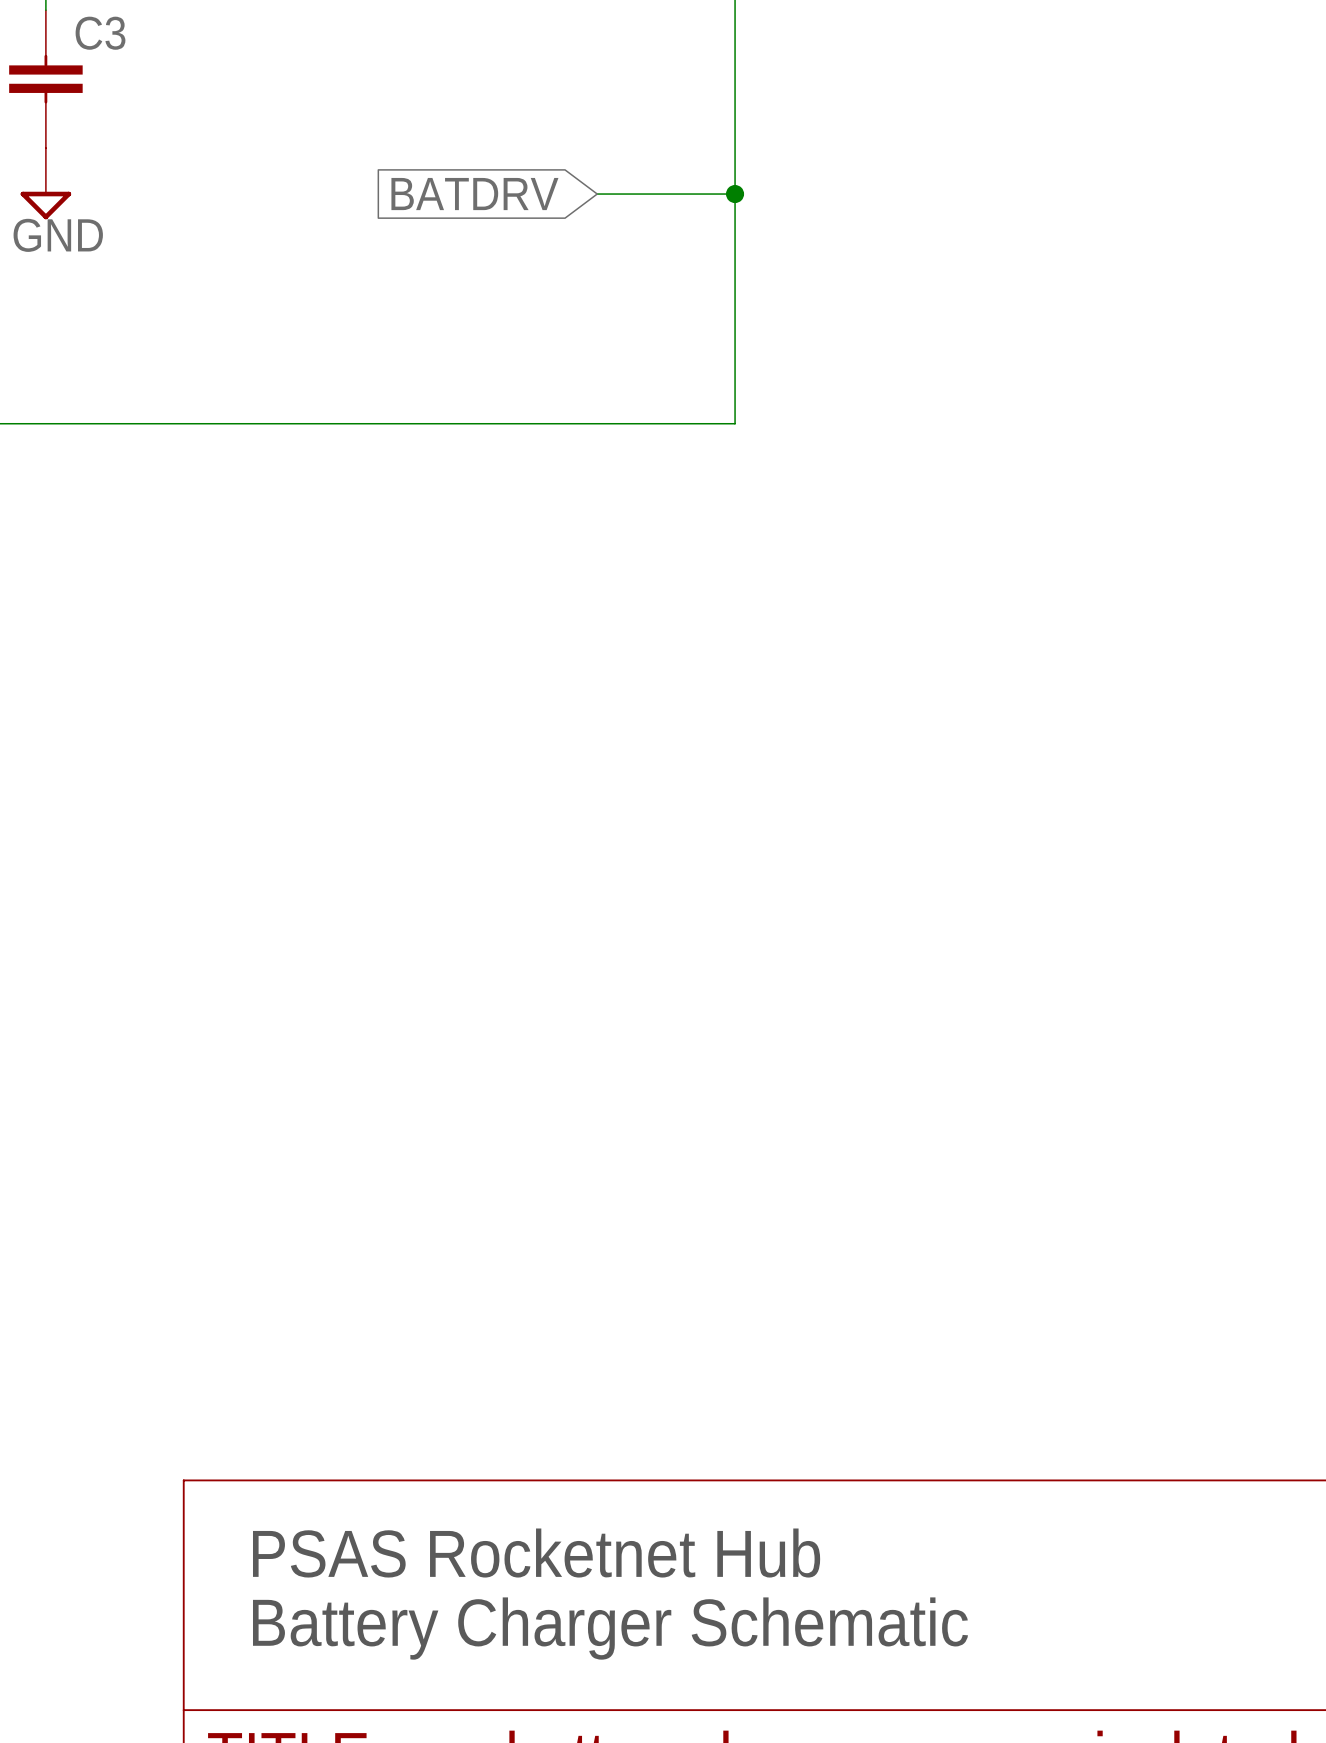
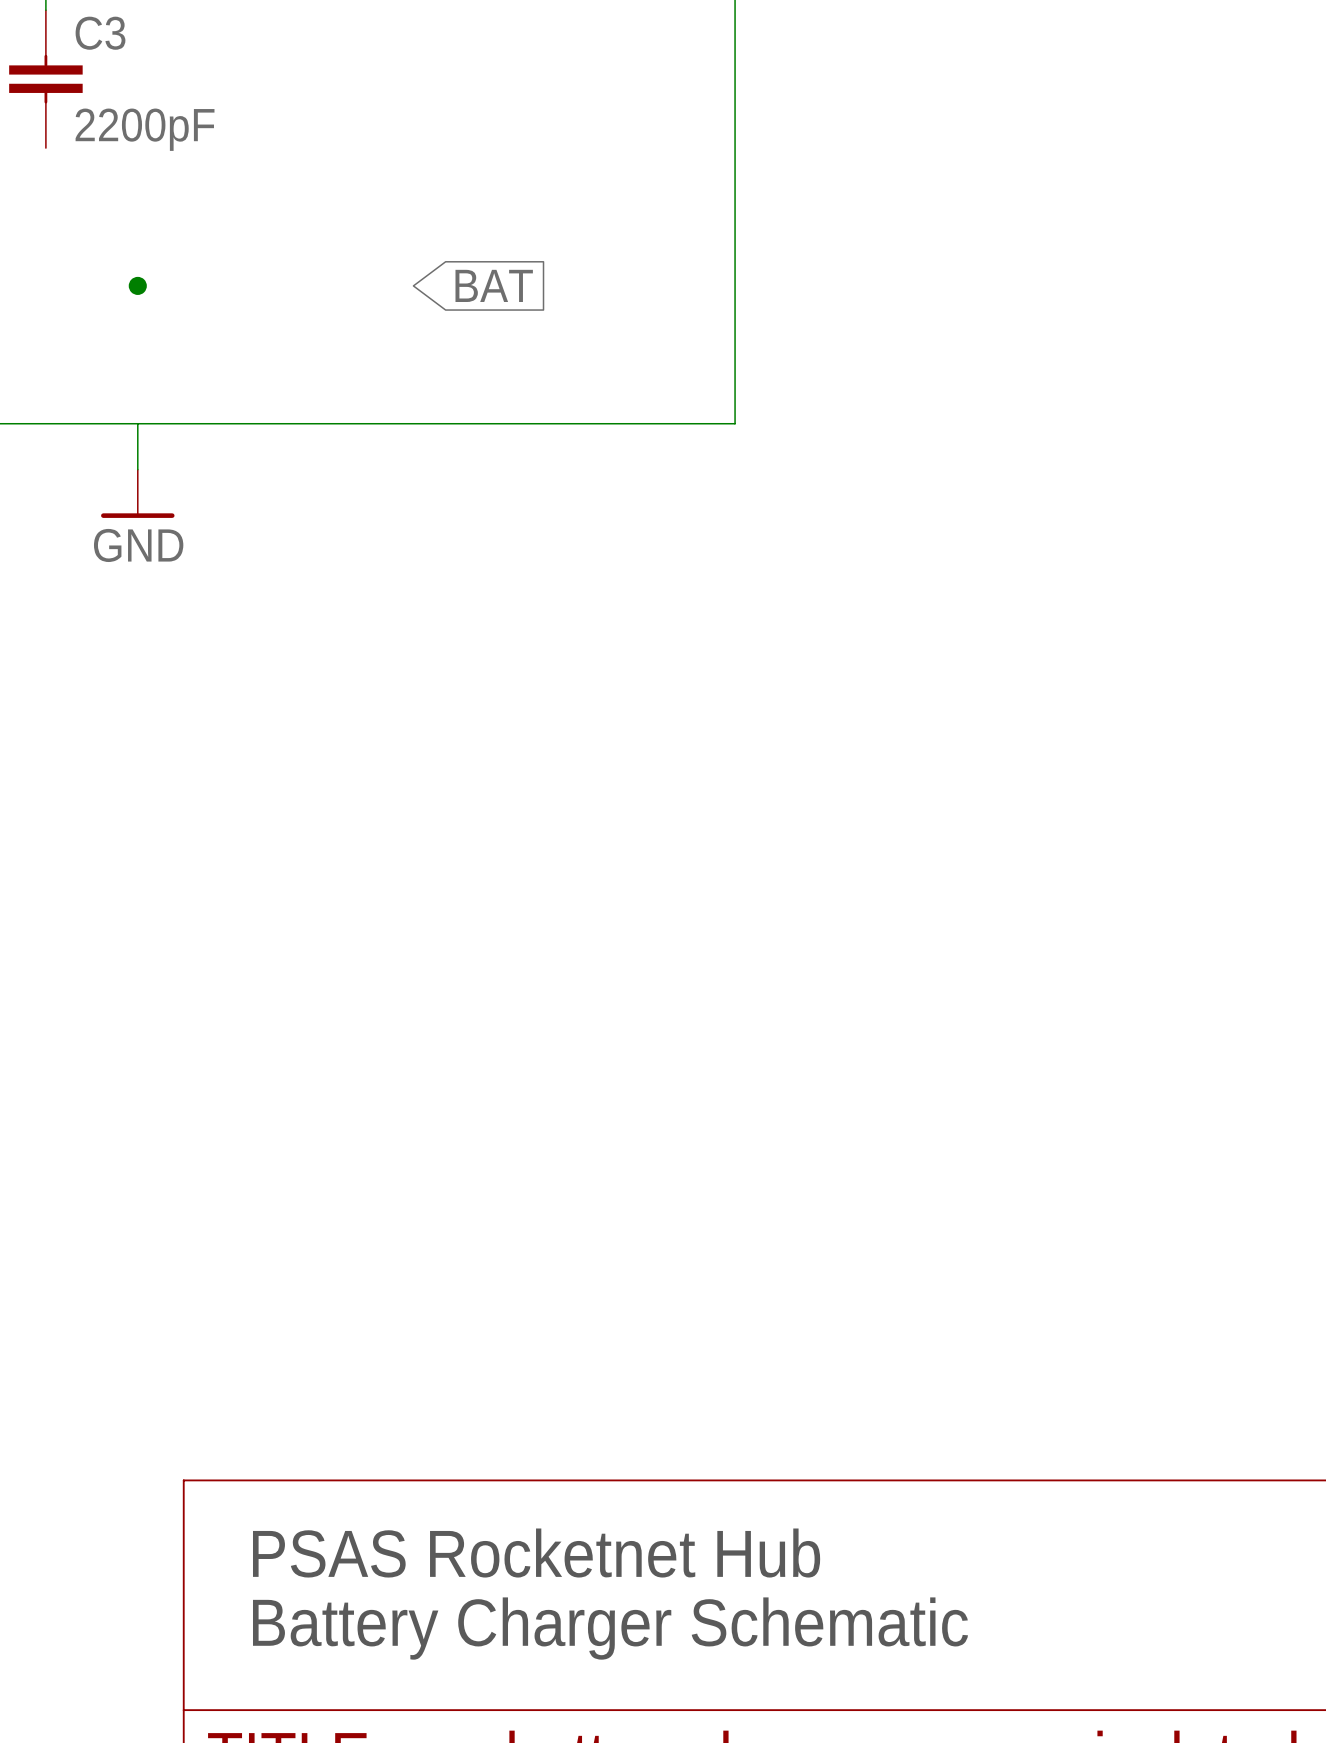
C3 value: none -> 2200pF (145, 129)
power symbol: GND (45, 183) -> none
global label: BATDRV (474, 194) -> none
wire: (597, 194) (735, 194) -> none
junction: (735, 194) -> none
junction: none -> (137, 285)
global label: none -> BAT (494, 285)
wire: none -> (137, 423) (137, 469)
power symbol: none -> GND (137, 493)

